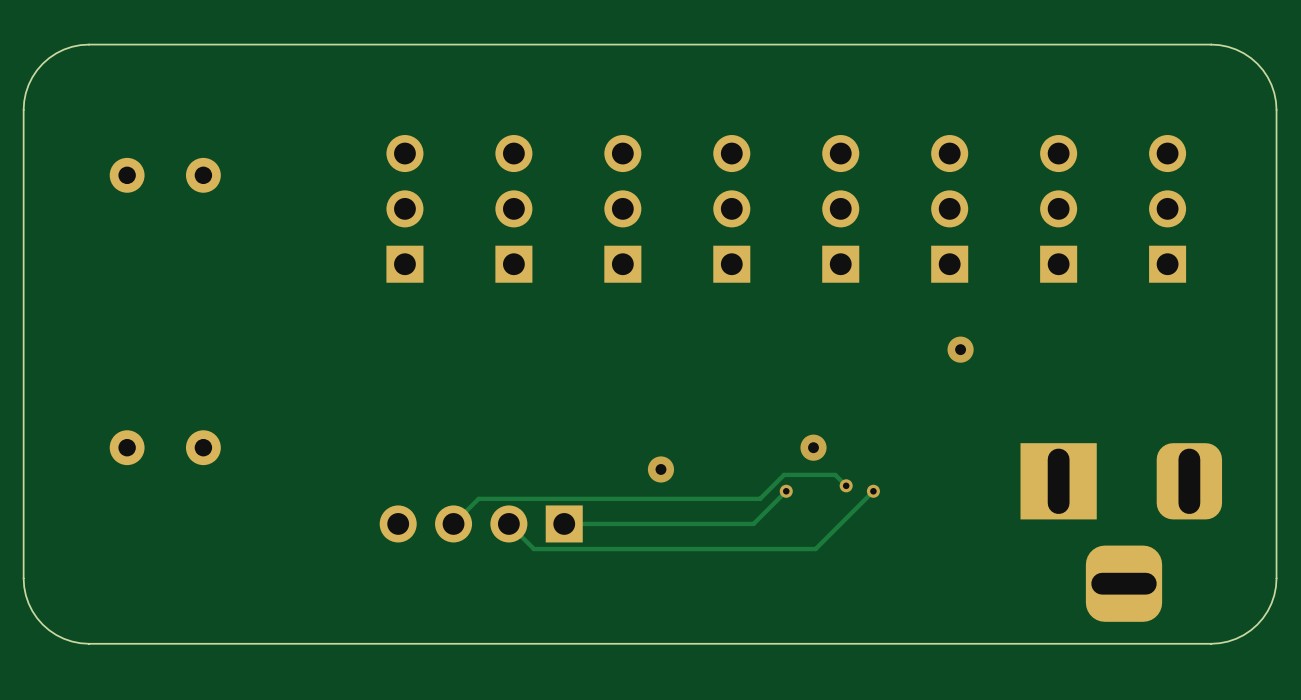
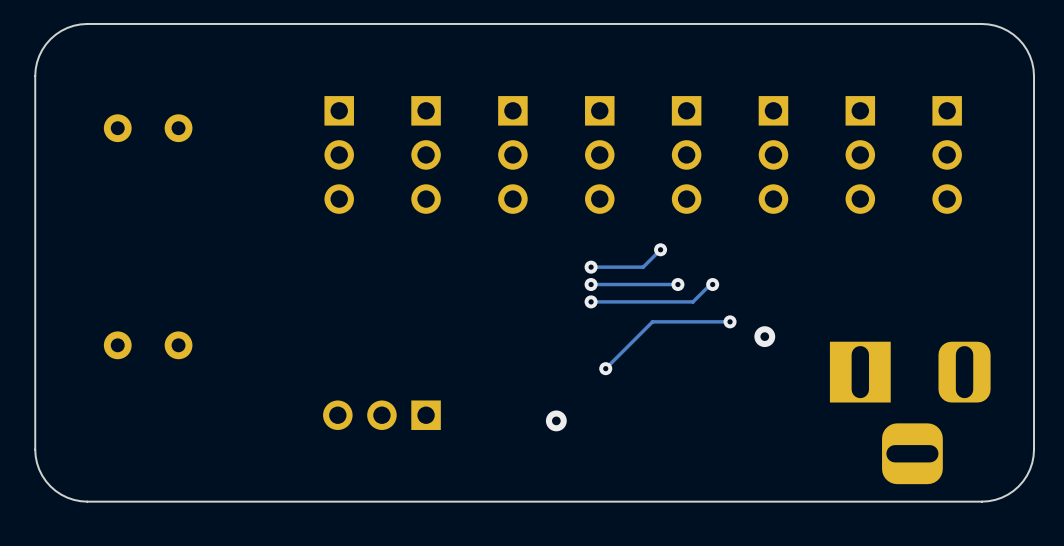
part rotation: 0° (404, 208) -> 180° (339, 154)
part rotation: 0° (513, 208) -> 180° (426, 154)
part rotation: 0° (622, 208) -> 180° (512, 154)
part rotation: 0° (731, 208) -> 180° (599, 154)
part rotation: 0° (840, 208) -> 180° (686, 154)
part rotation: 0° (949, 208) -> 180° (773, 154)
part rotation: 0° (1058, 208) -> 180° (860, 154)
part rotation: 0° (1167, 208) -> 180° (947, 154)
track: none -> (660, 249) (643, 267) (591, 267)
via: none -> (660, 249)
via: none -> (591, 267)
via: (960, 349) -> none
via: none -> (591, 284)
track: none -> (677, 284) (591, 284)
via: none -> (677, 284)
track: none -> (712, 284) (710, 284) (693, 301) (591, 301)
via: none -> (712, 284)
via: none -> (591, 301)
track: none -> (730, 321) (652, 321) (605, 368)
via: none -> (730, 321)
via: none -> (764, 336)
via: (813, 447) -> none
via position: (660, 469) -> (556, 420)
via: none -> (605, 368)
track: (846, 485) (835, 474) (784, 474) (760, 498) (478, 498) (453, 523) -> none
via: (846, 485) -> none
track: (786, 491) (753, 523) (564, 523) -> none
via: (786, 491) -> none
track: (873, 491) (815, 549) (533, 549) (508, 523) -> none
via: (873, 491) -> none
part: (481, 523) -> none
part: none -> (381, 415)

